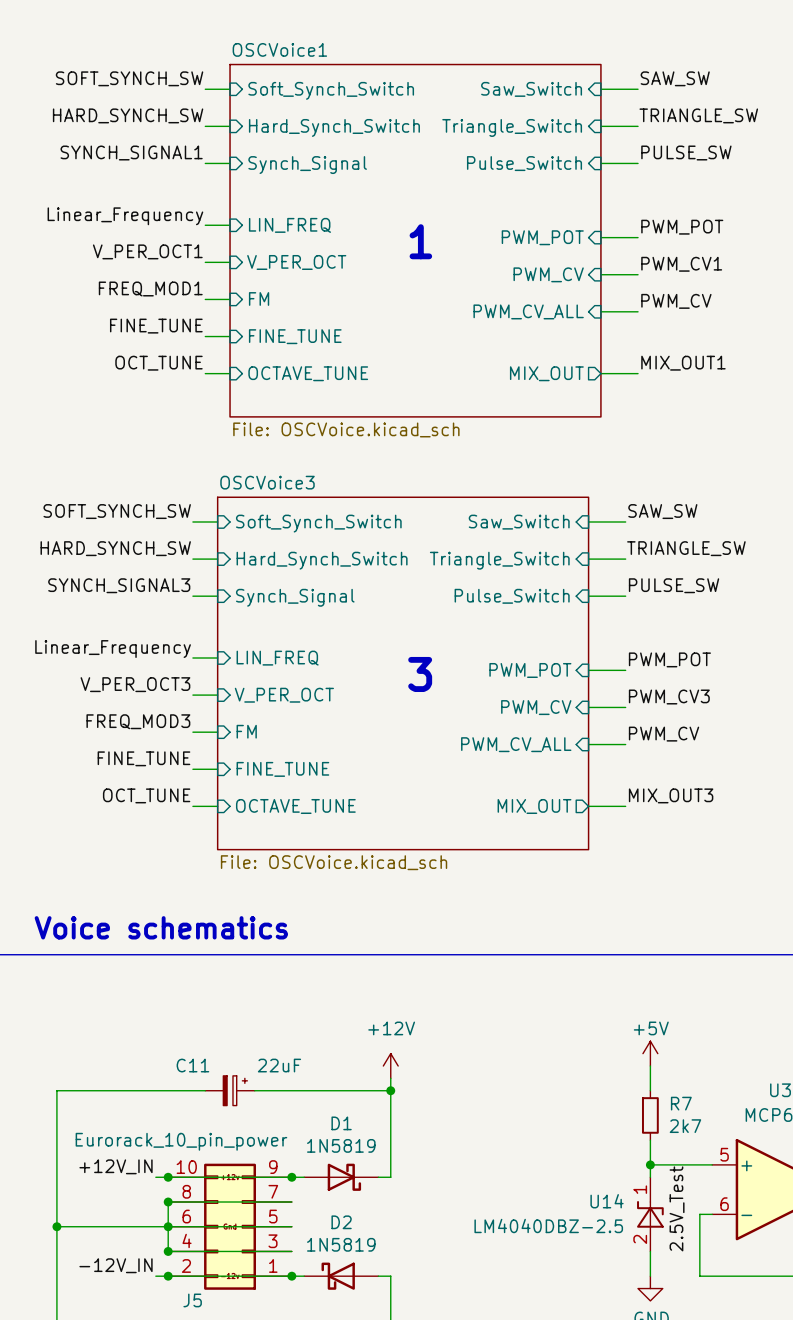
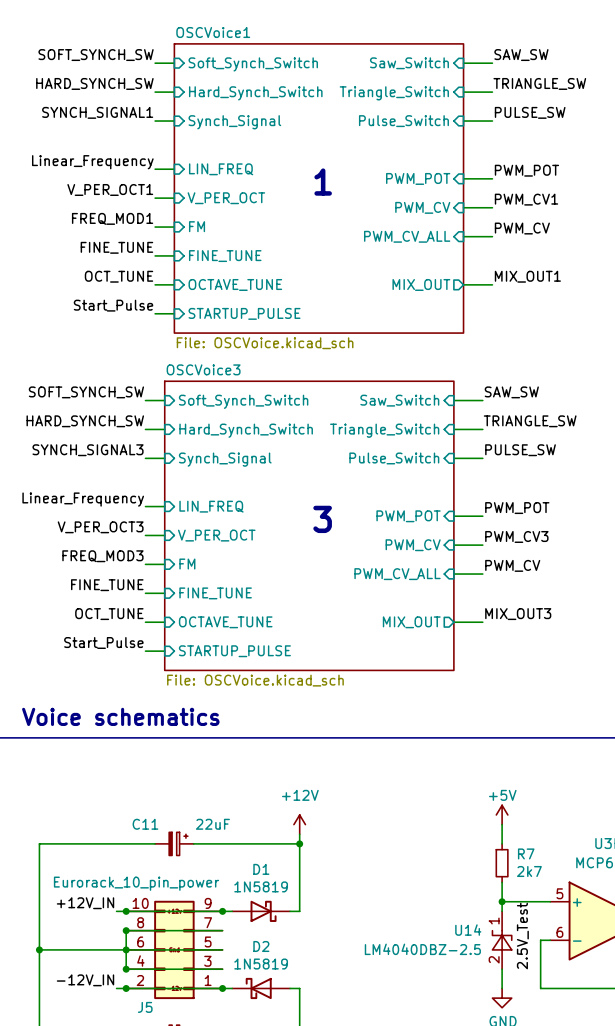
sheet OSCVoice1 shape: [229, 63, 602, 418] -> [173, 43, 465, 334]
label: none -> Start_Pulse (113, 305)
wire: none -> (155, 313) (174, 313)
sheet pin: none -> STARTUP_PULSE (244, 313)
sheet OSCVoice3 shape: [216, 496, 590, 851] -> [164, 380, 455, 671]
label: none -> Start_Pulse (103, 642)
wire: none -> (145, 651) (164, 651)
sheet pin: none -> STARTUP_PULSE (234, 651)

